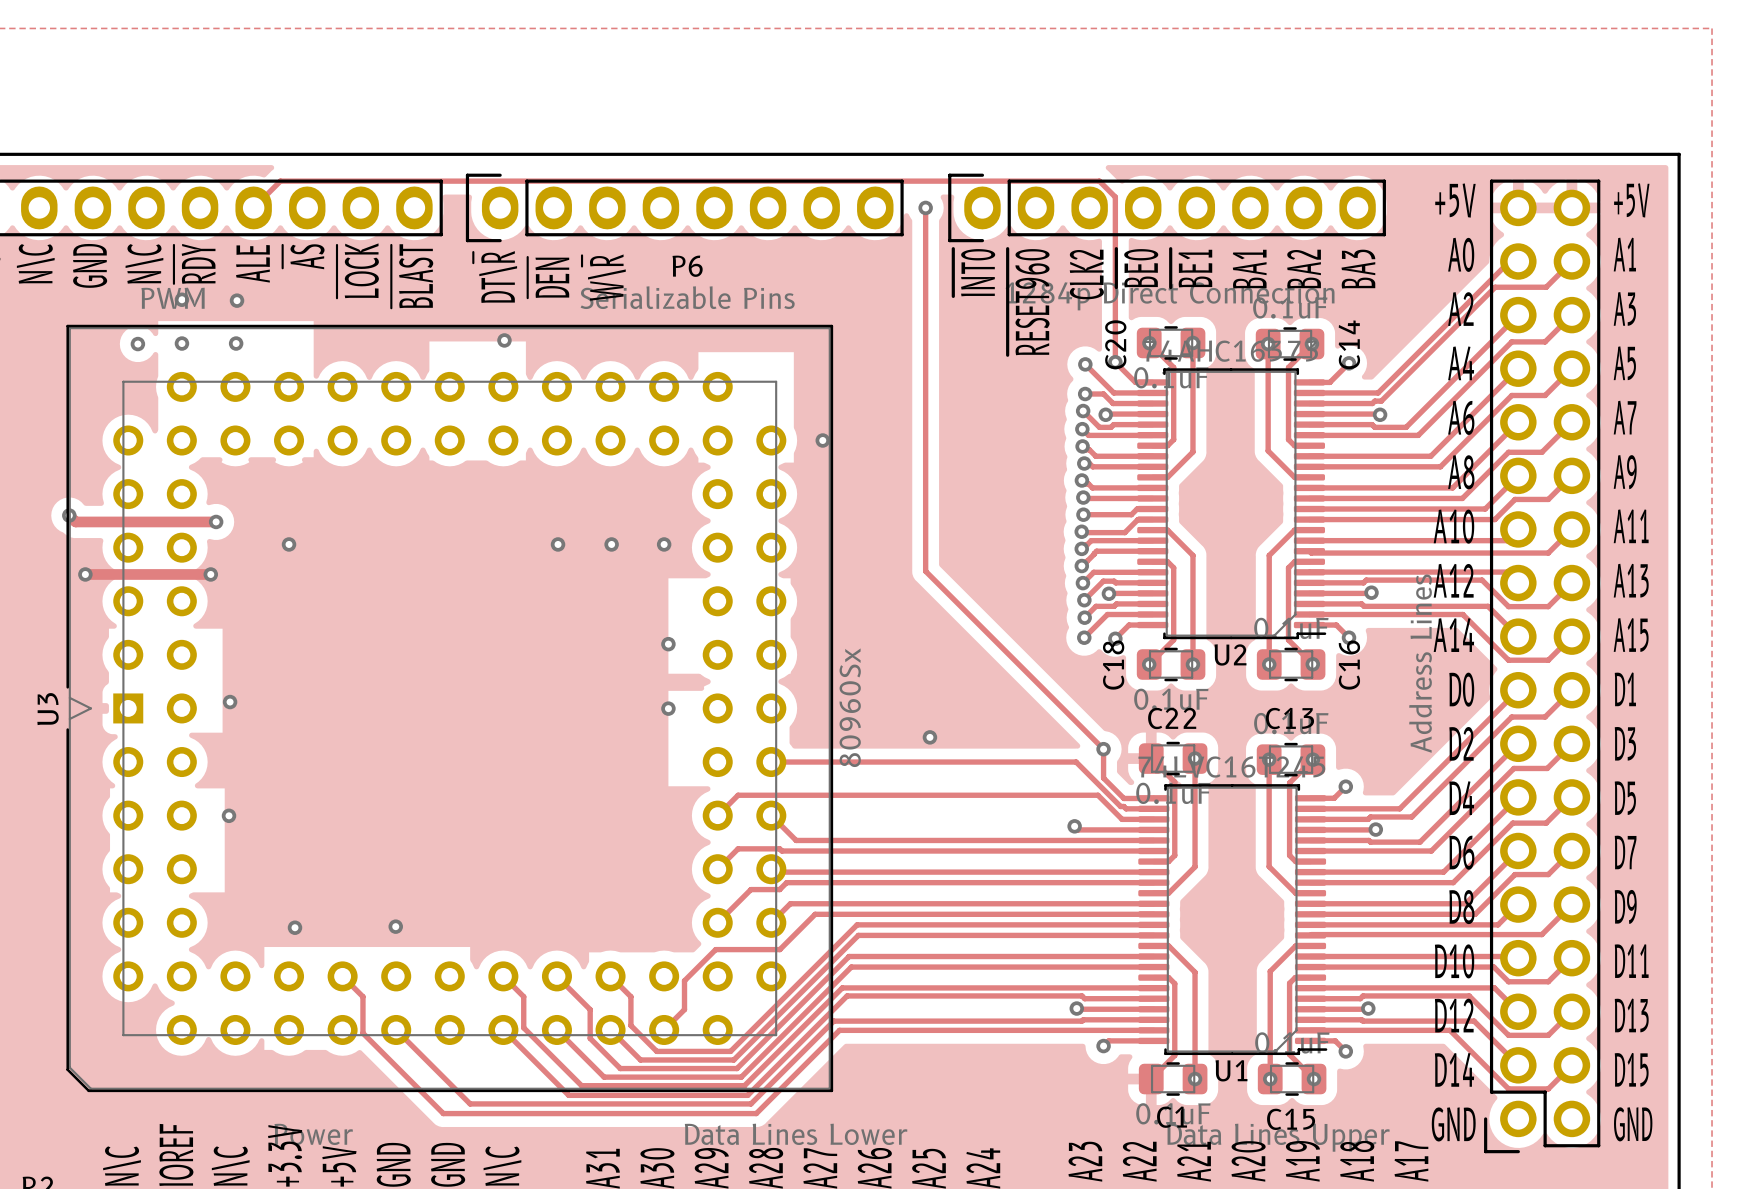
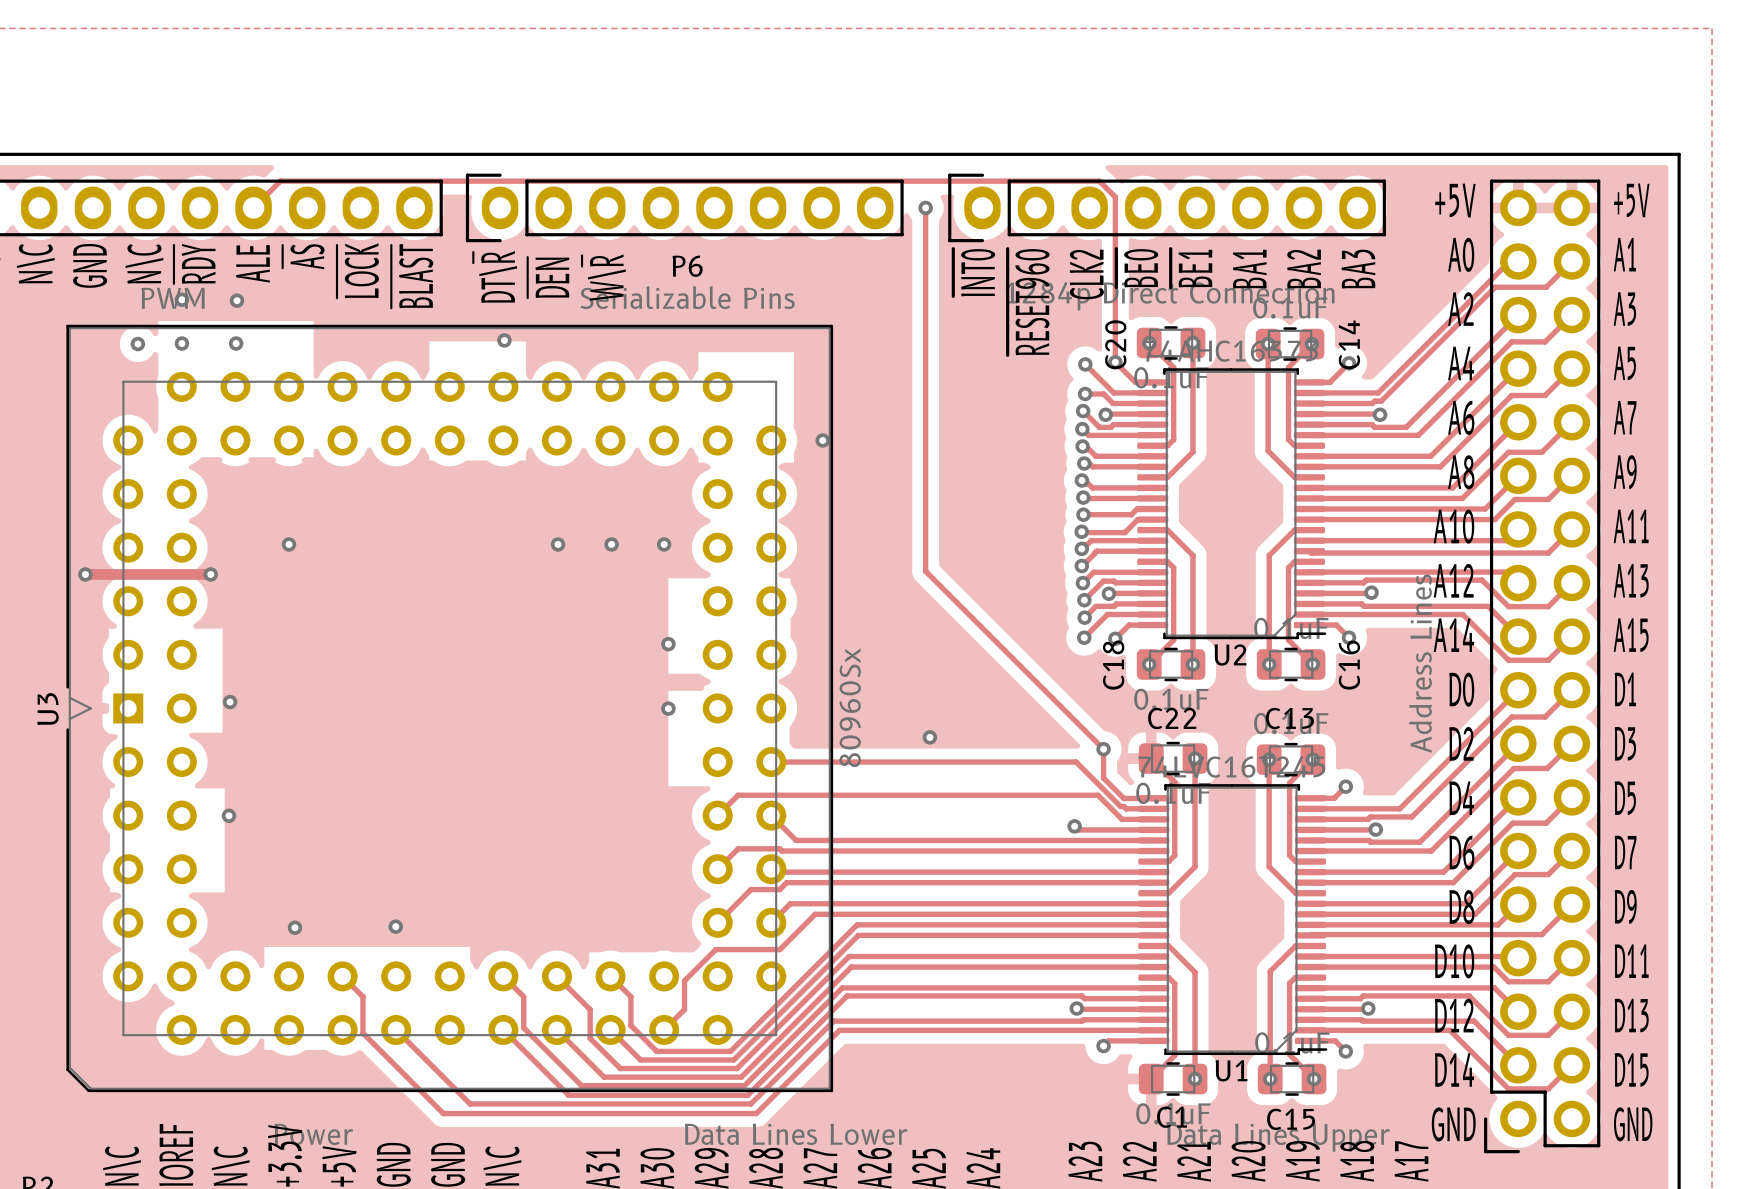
track: (69, 515) (75, 521) (216, 521) -> none
via: (69, 515) -> none
via: (216, 521) -> none

